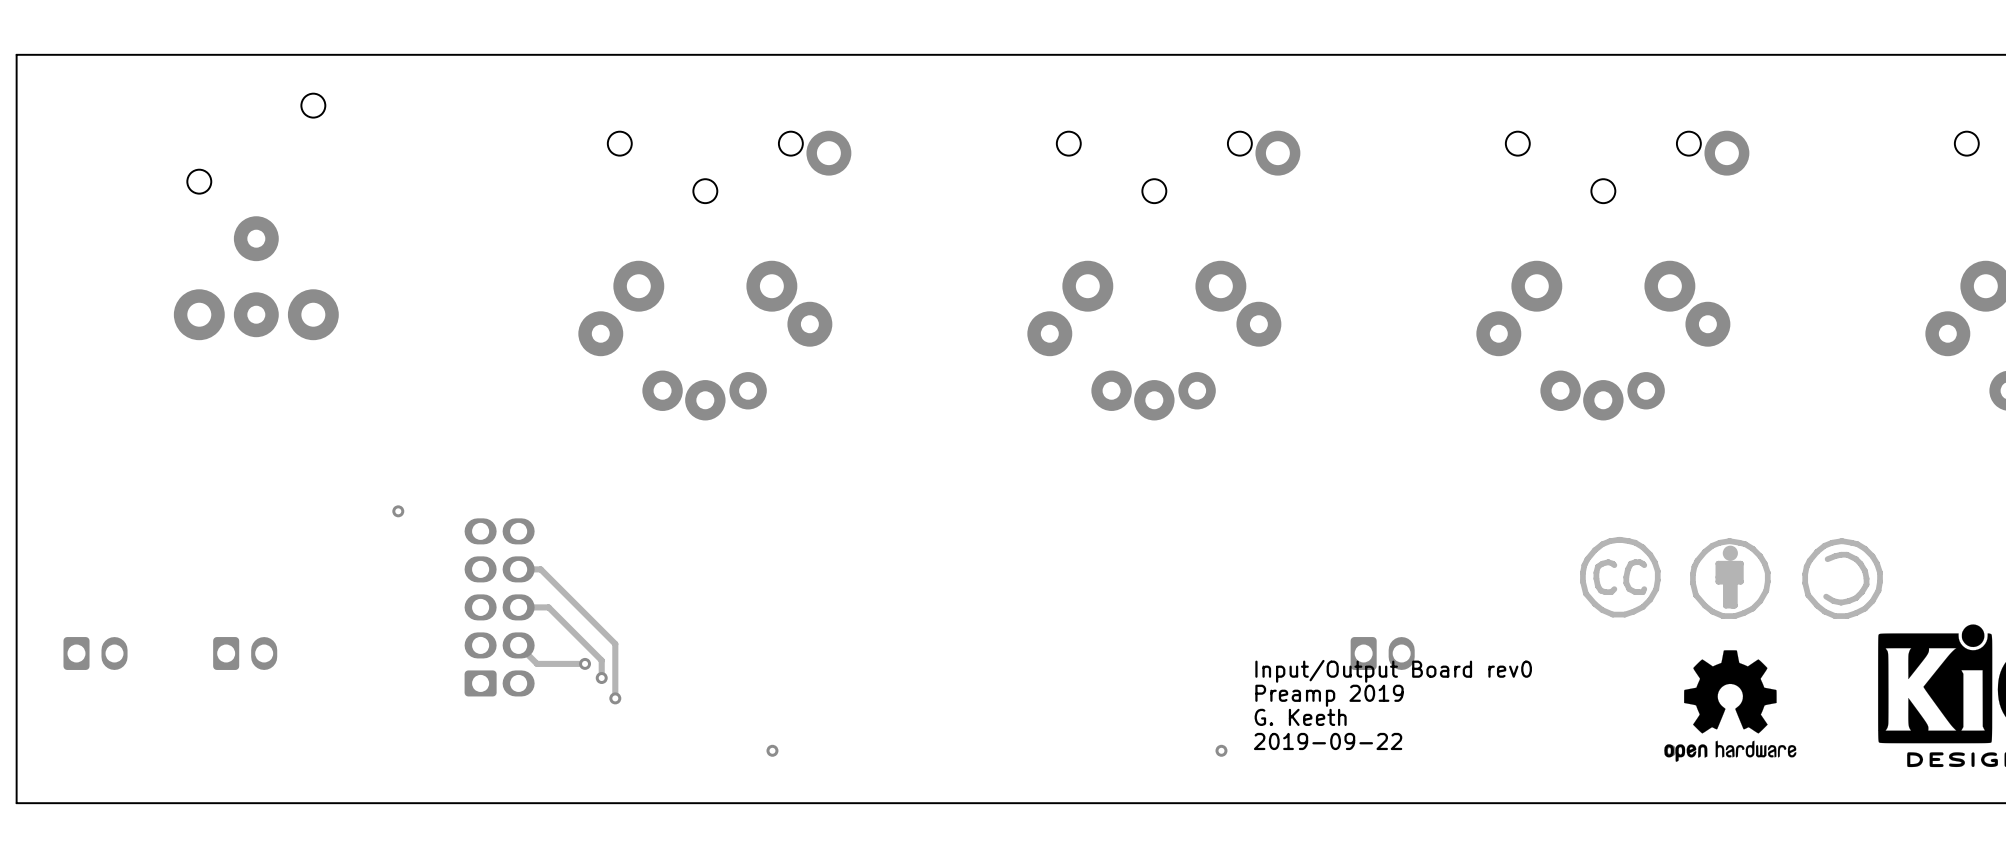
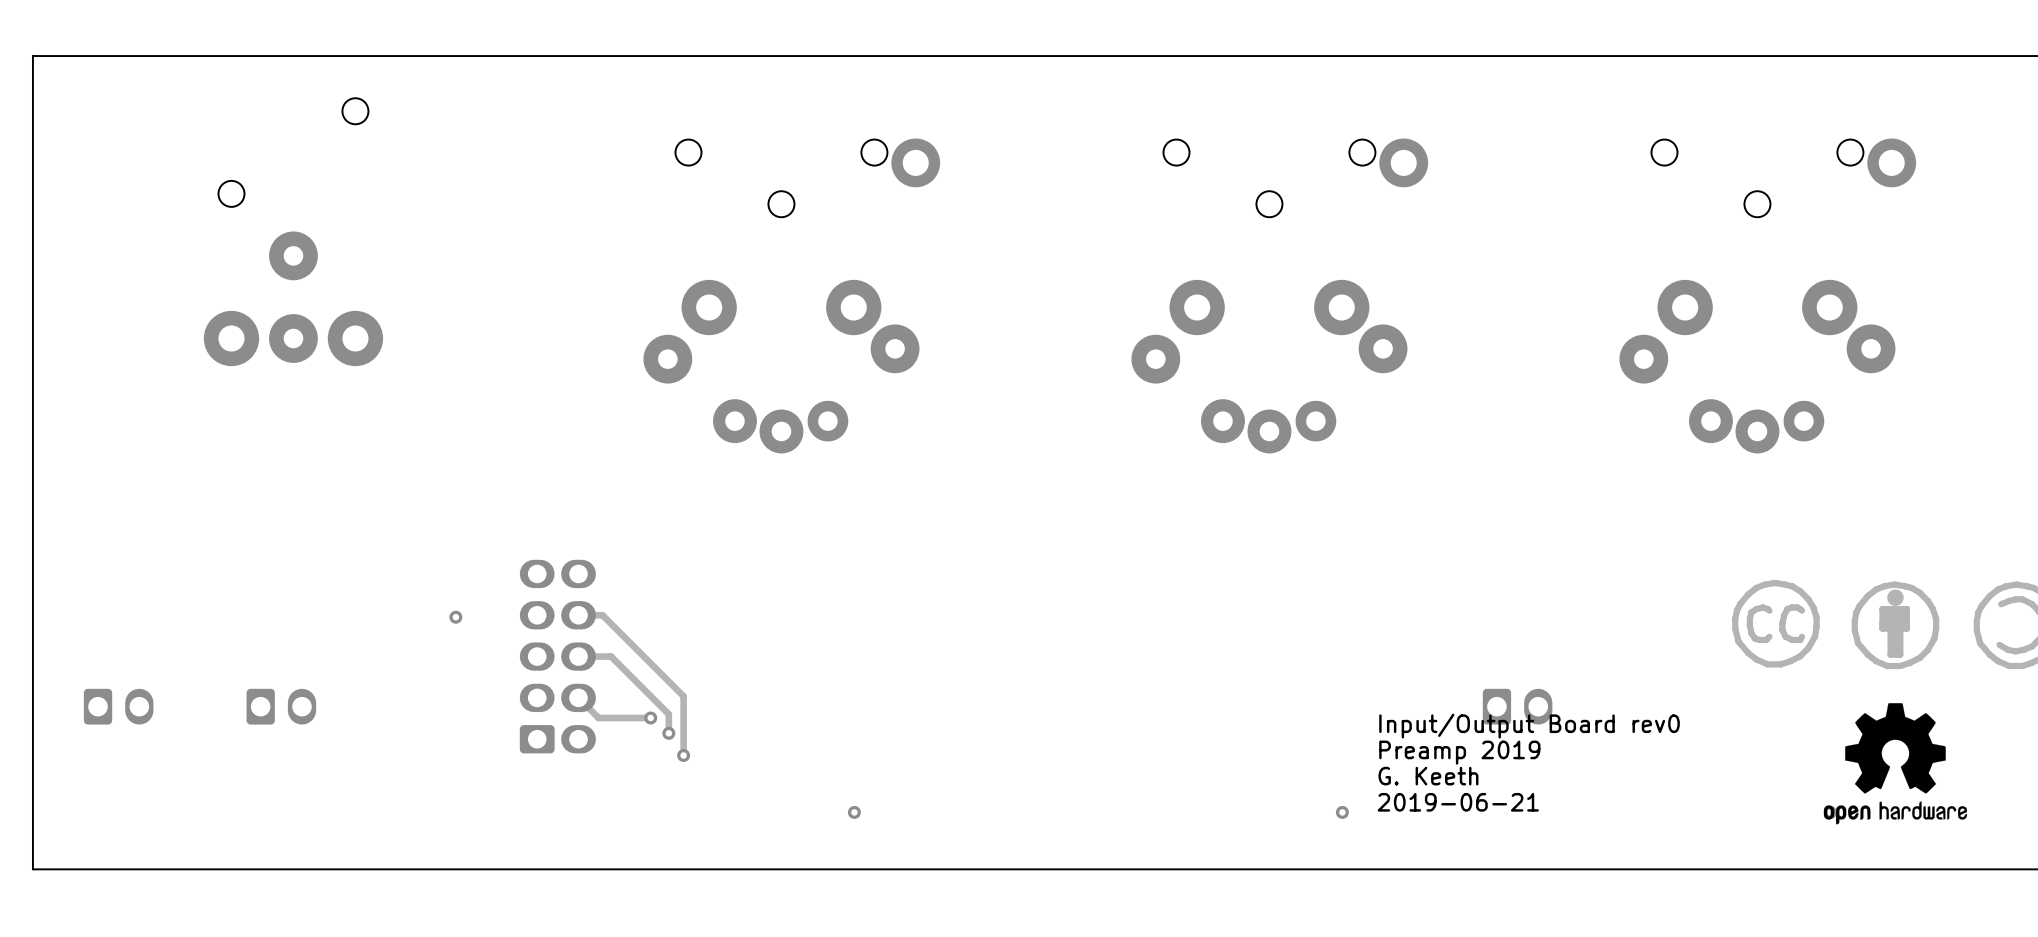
via position: (398, 511) -> (455, 617)
text: 2019-09-22 (1328, 741) -> 2019-06-21 (1458, 802)

